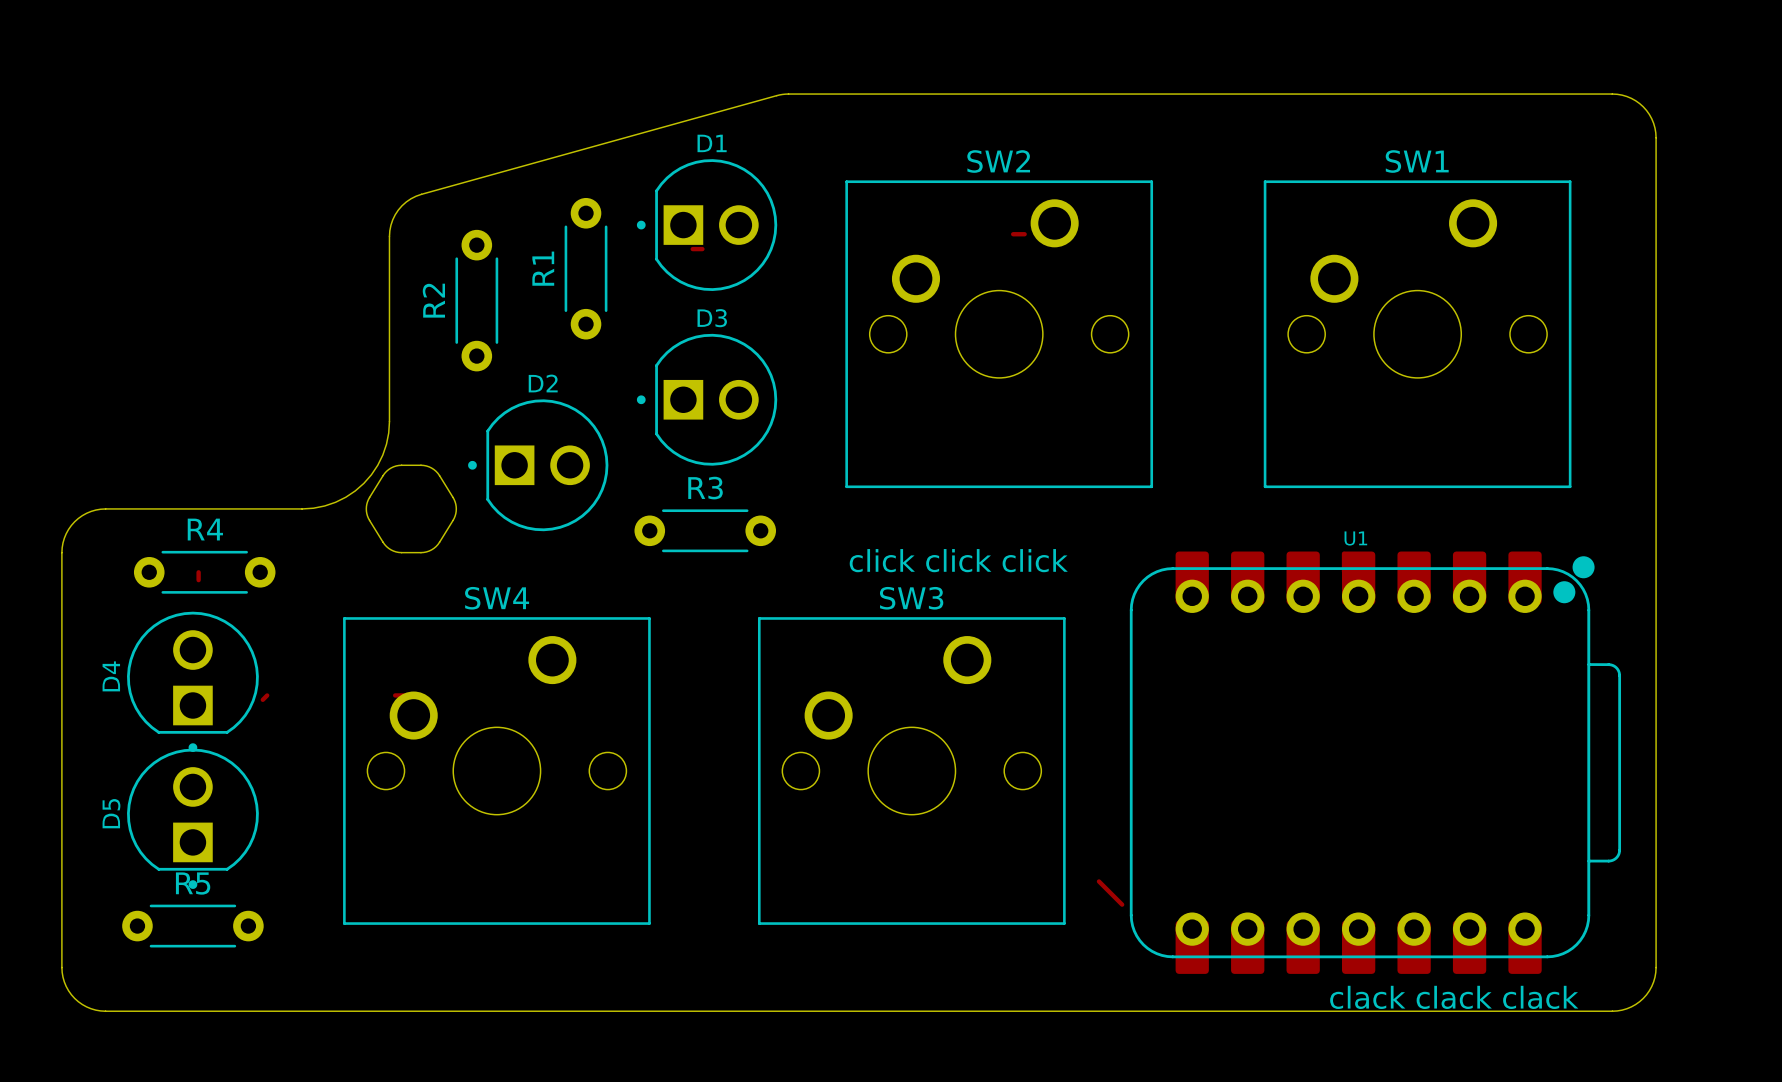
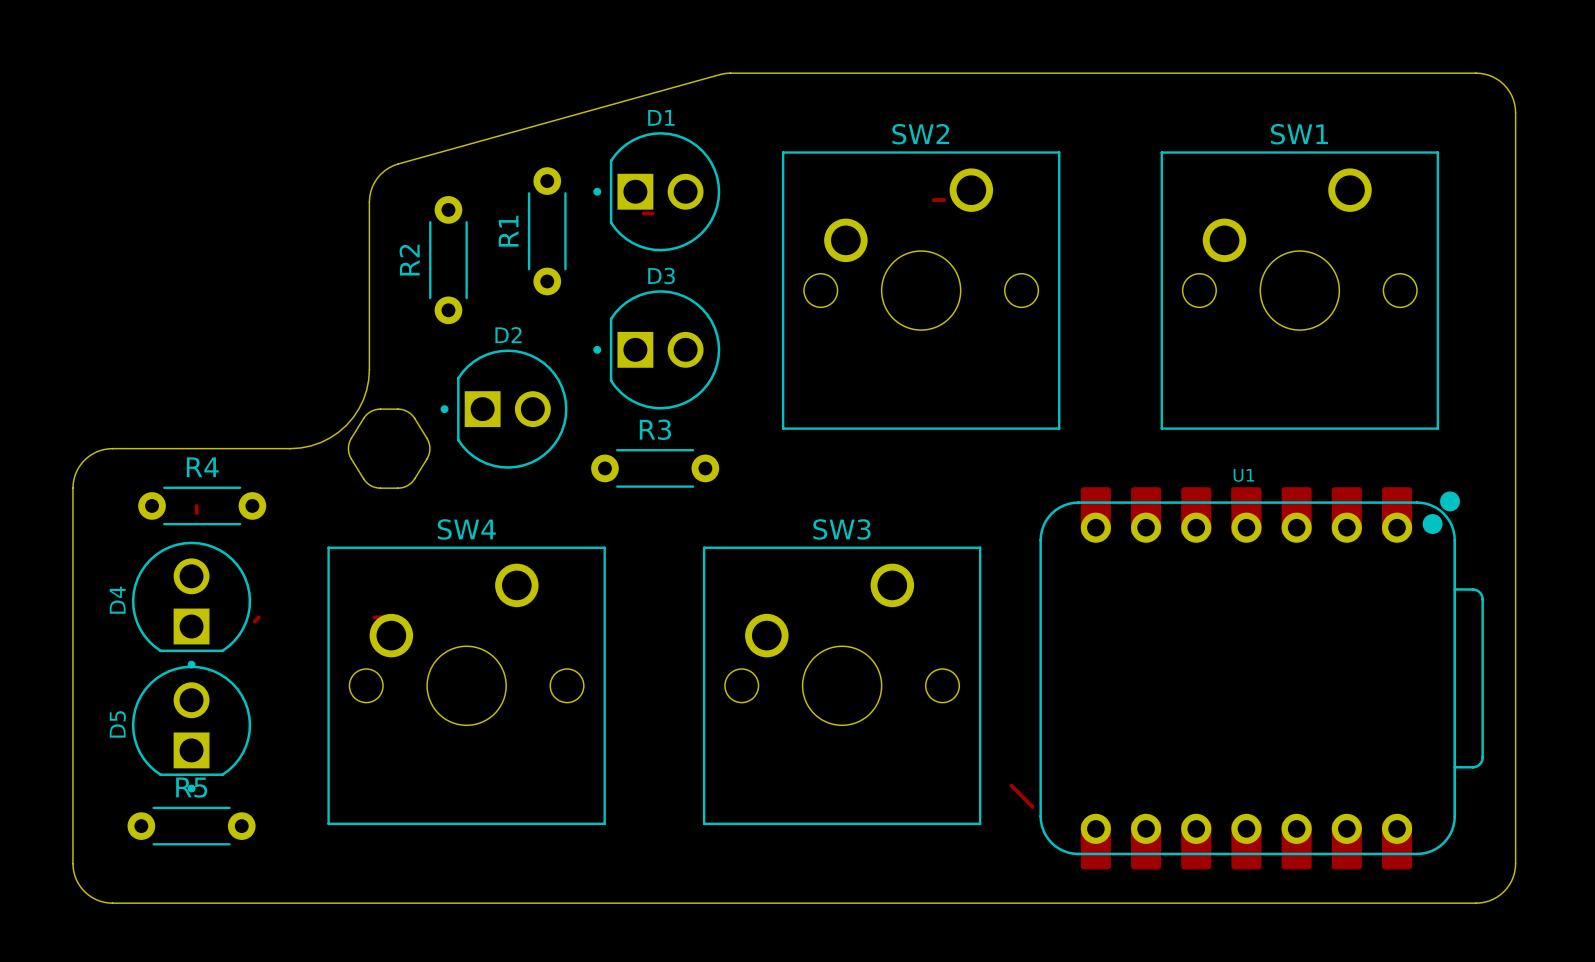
text: click click click (958, 560) -> none
text: clack clack clack (1454, 997) -> none

